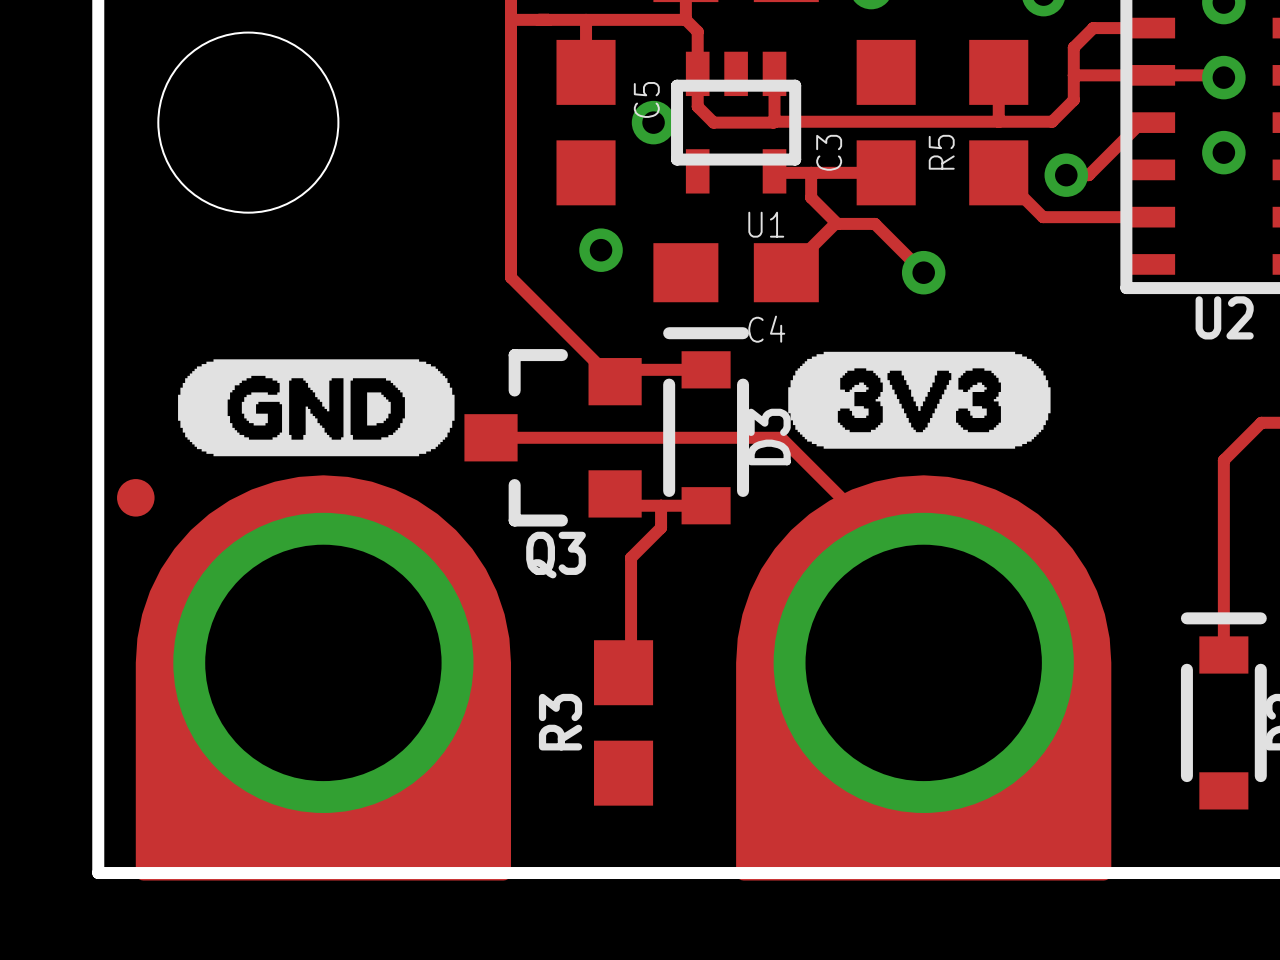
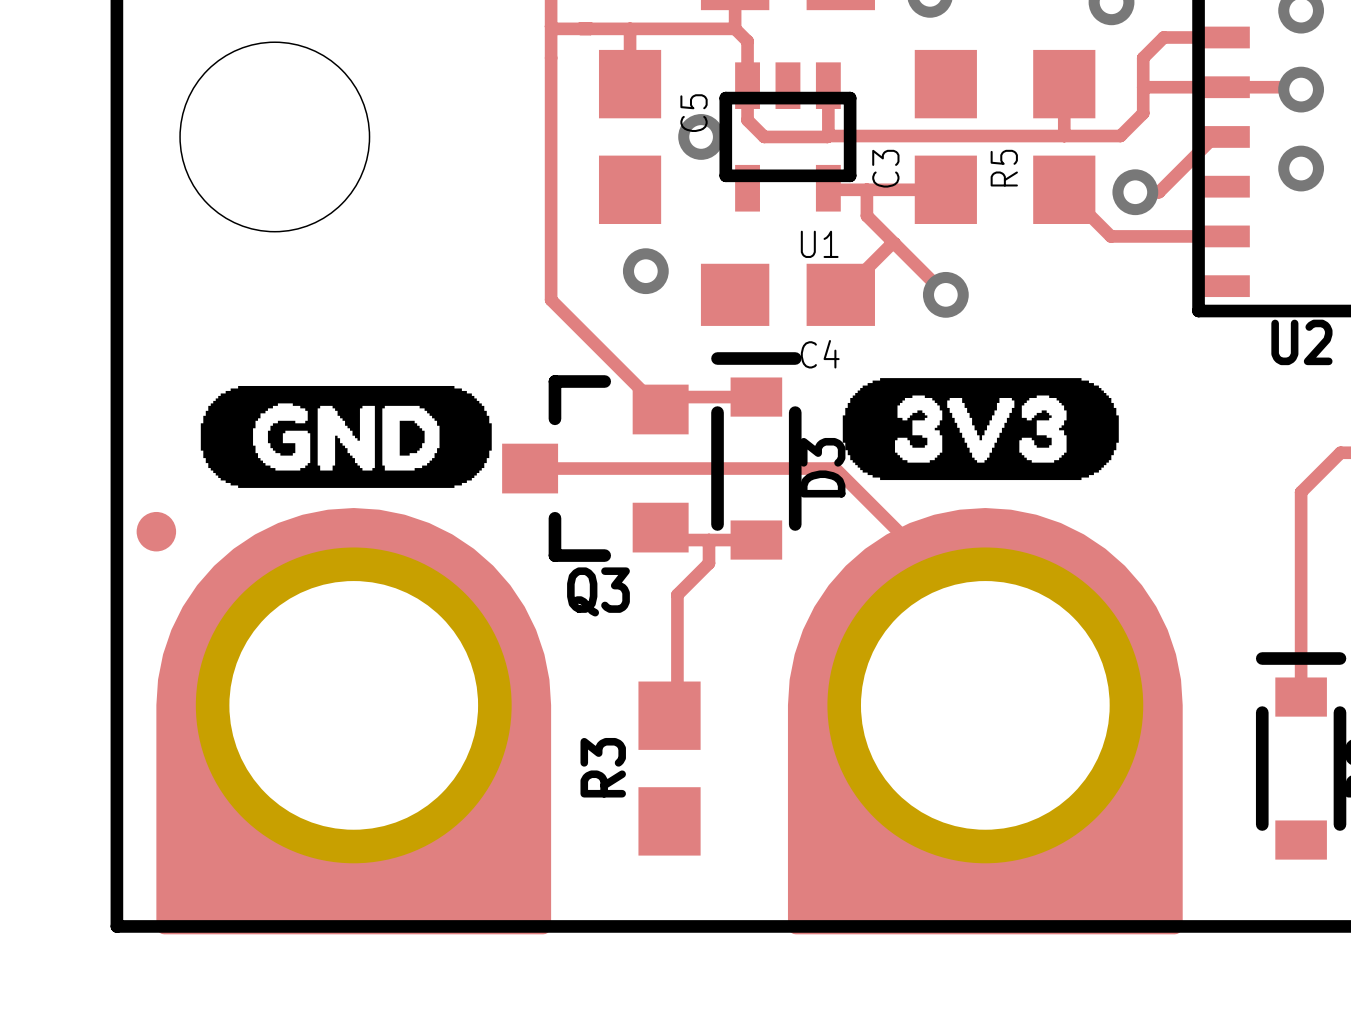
track: (837, 223) (874, 223) (923, 272) -> (894, 243) (945, 294)
via position: (923, 272) -> (945, 294)

